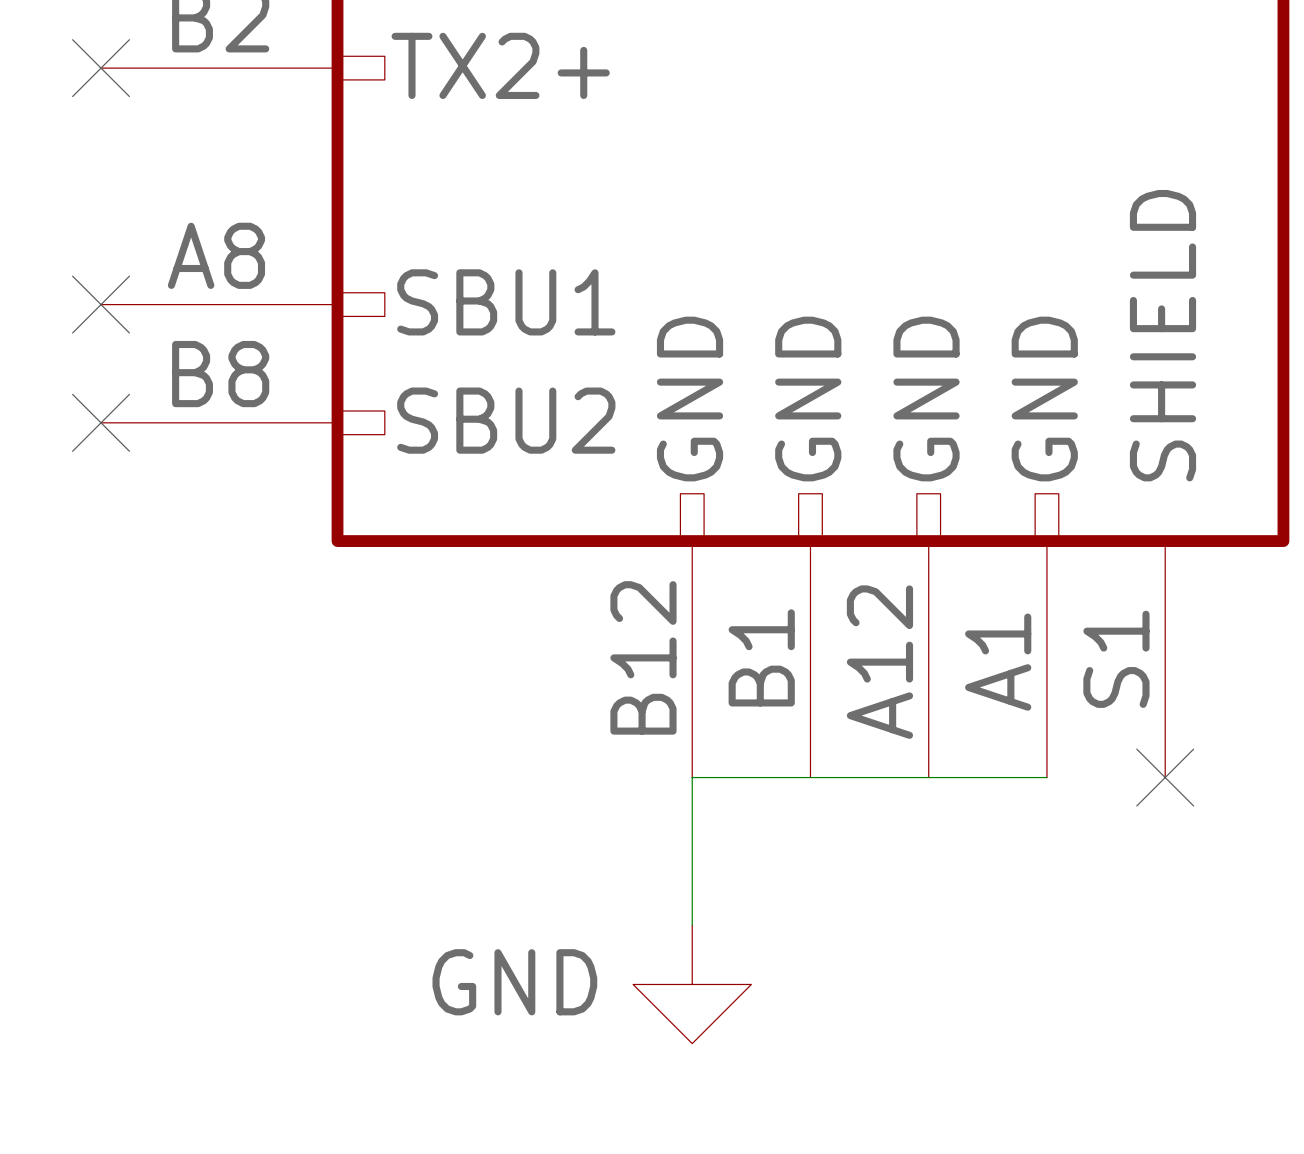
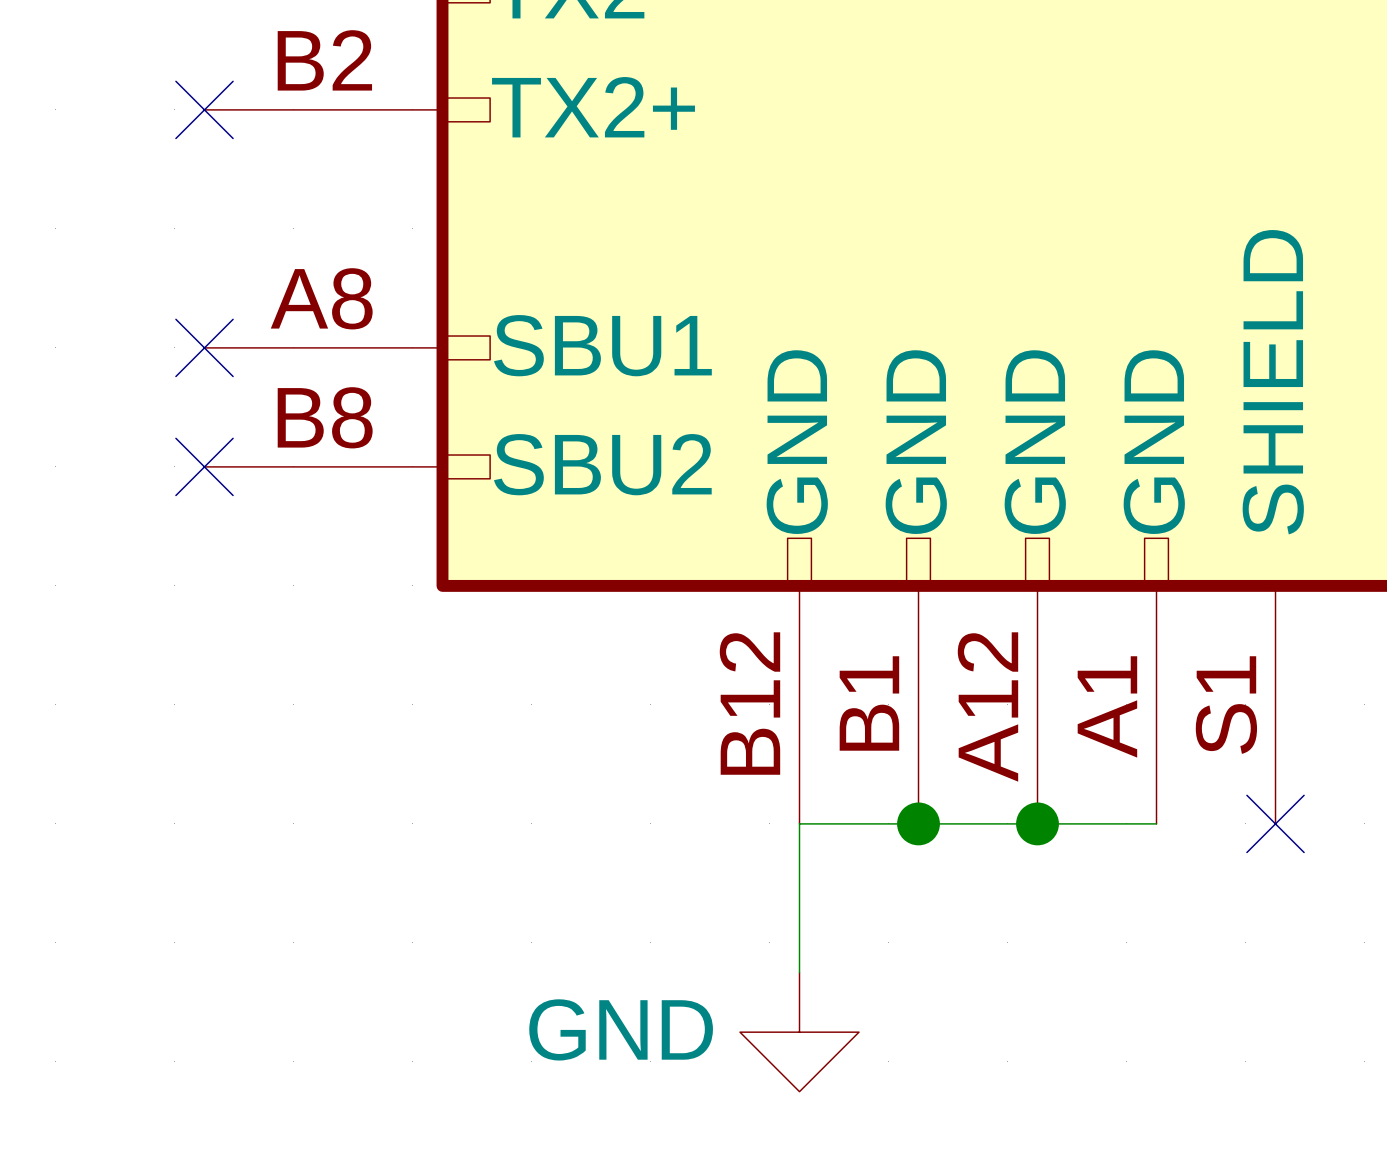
junction: none -> (918, 823)
junction: none -> (1037, 823)

